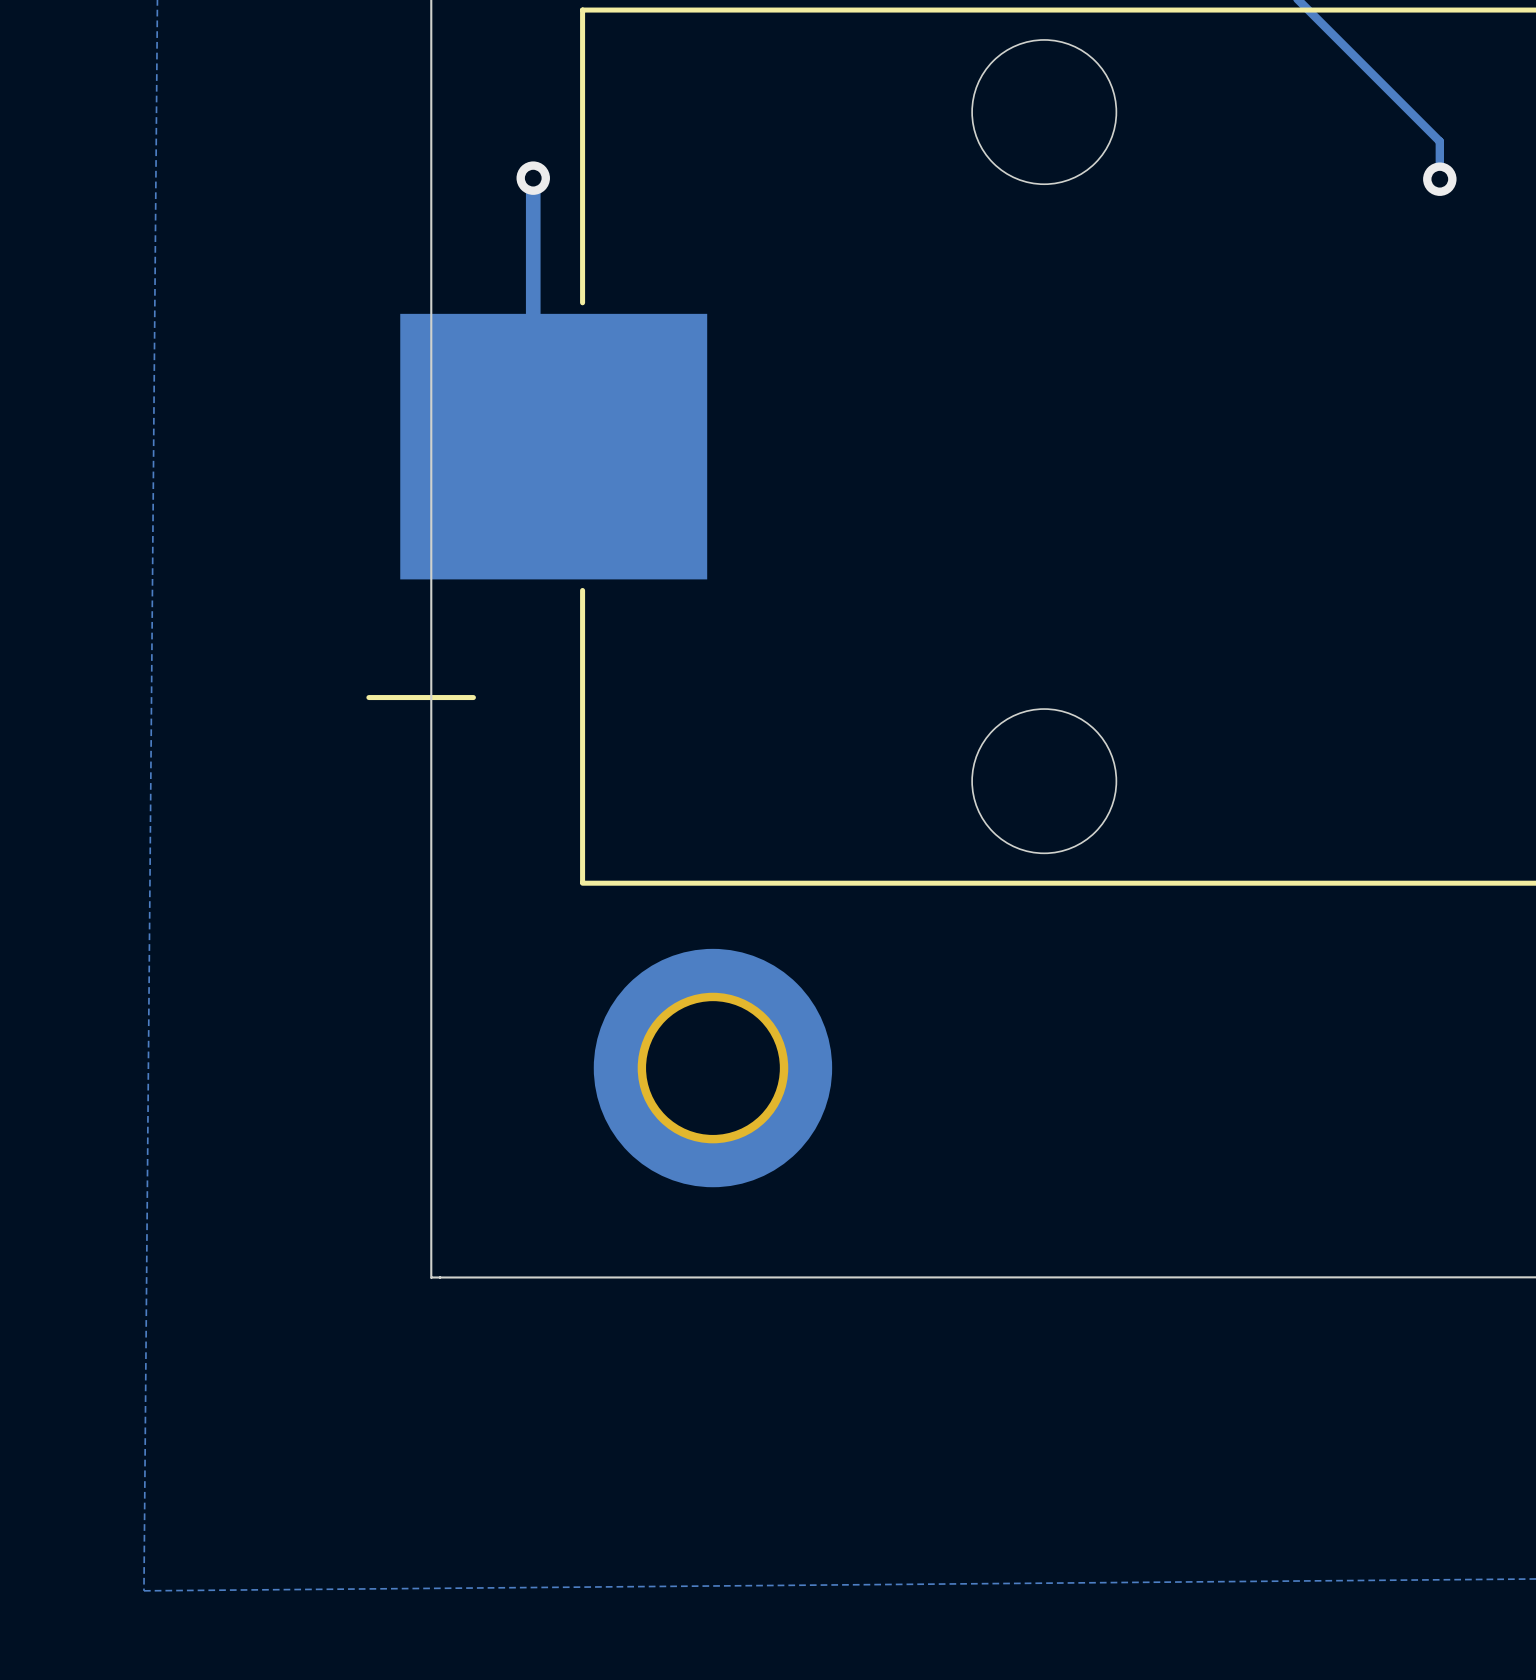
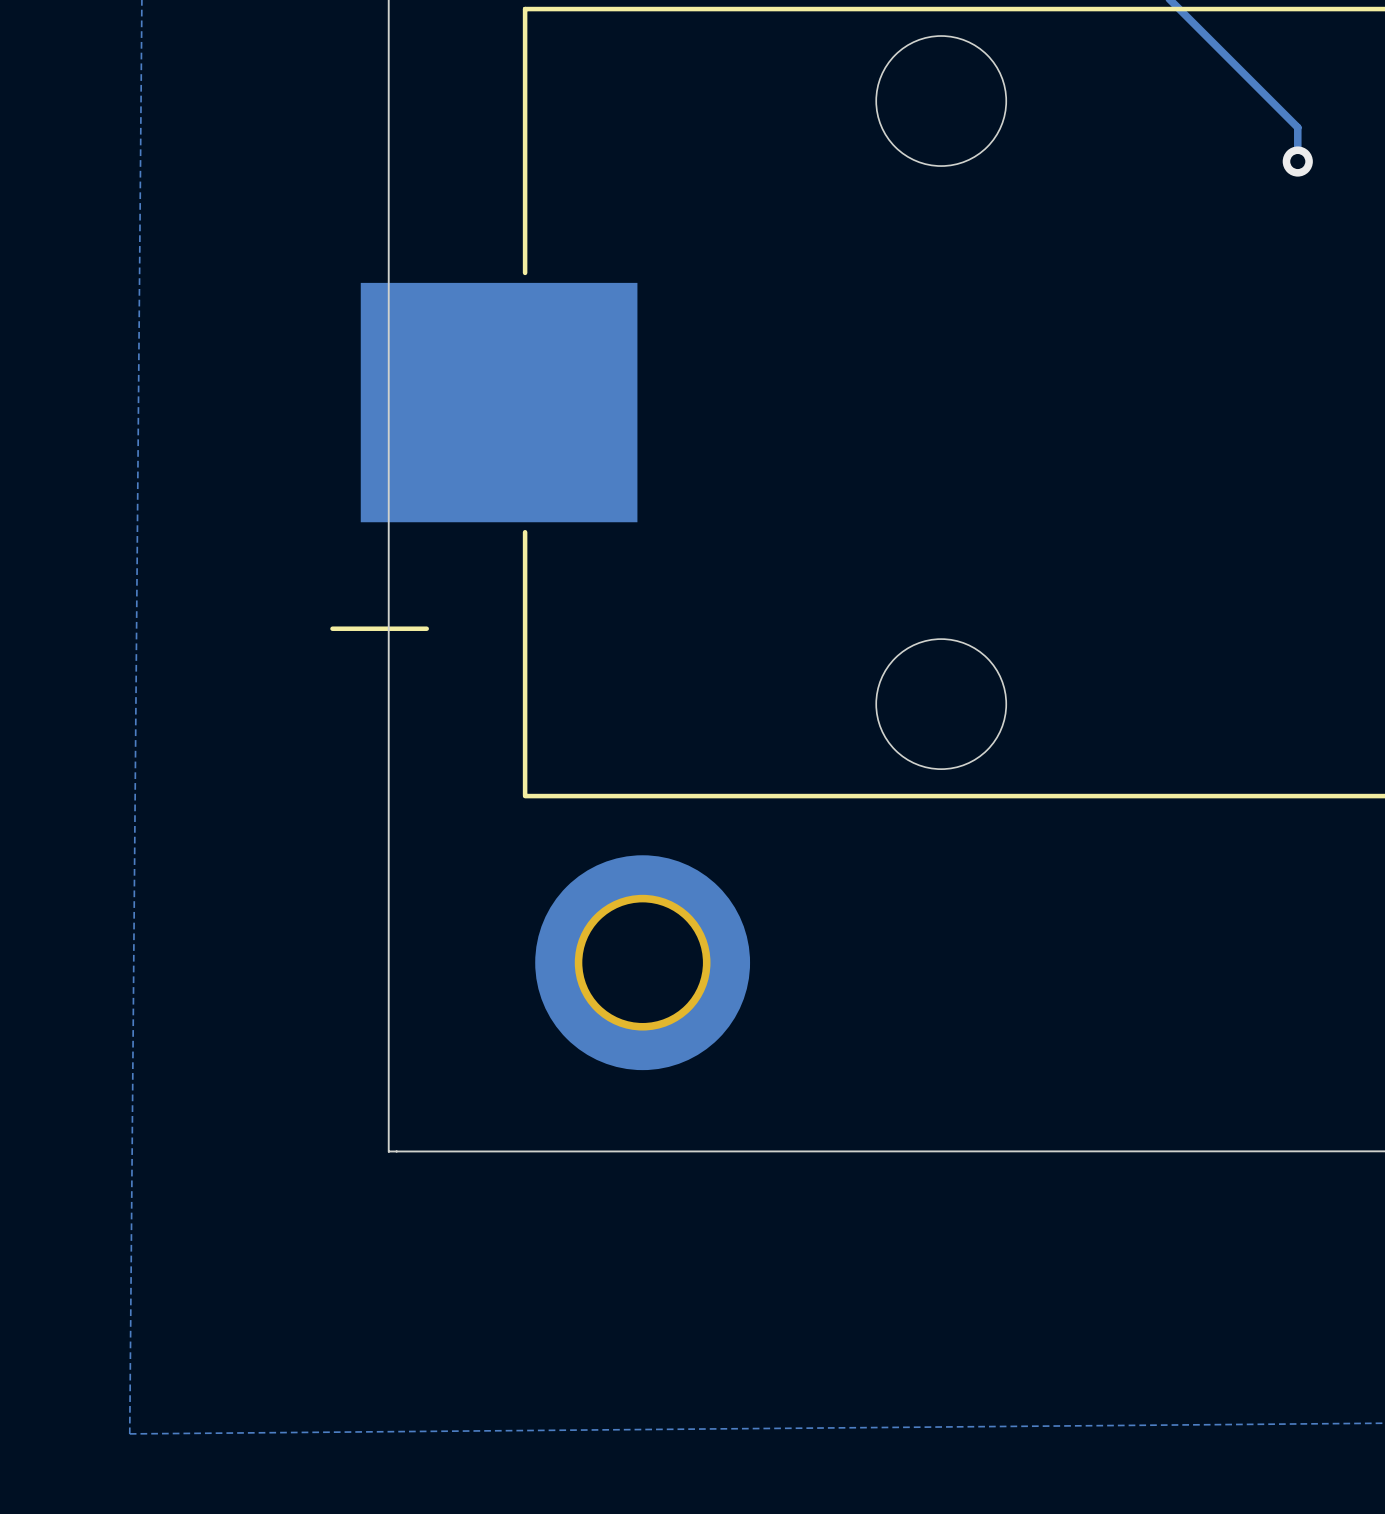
track: (533, 178) (533, 390) (553, 411) (553, 446) -> none
via: (533, 178) -> none

